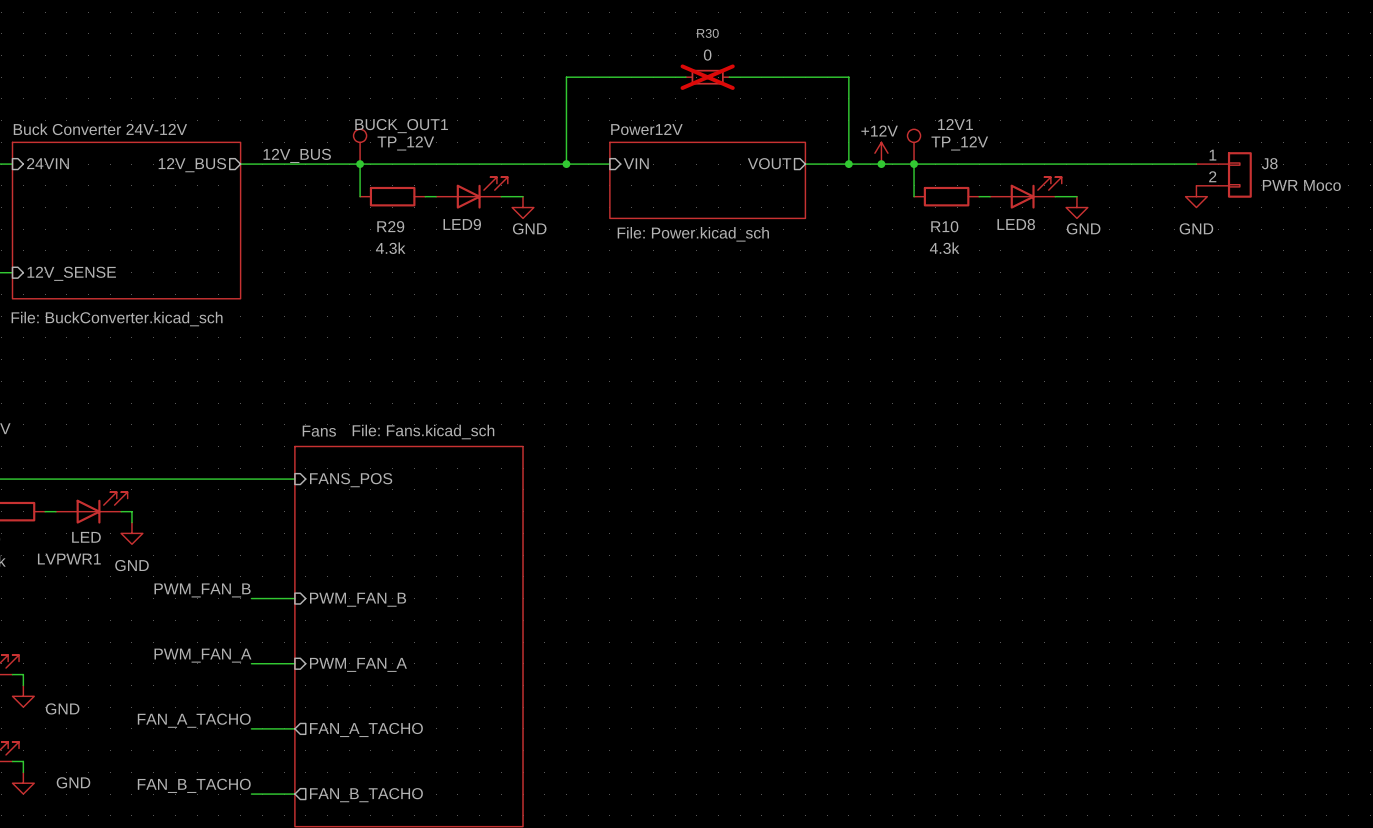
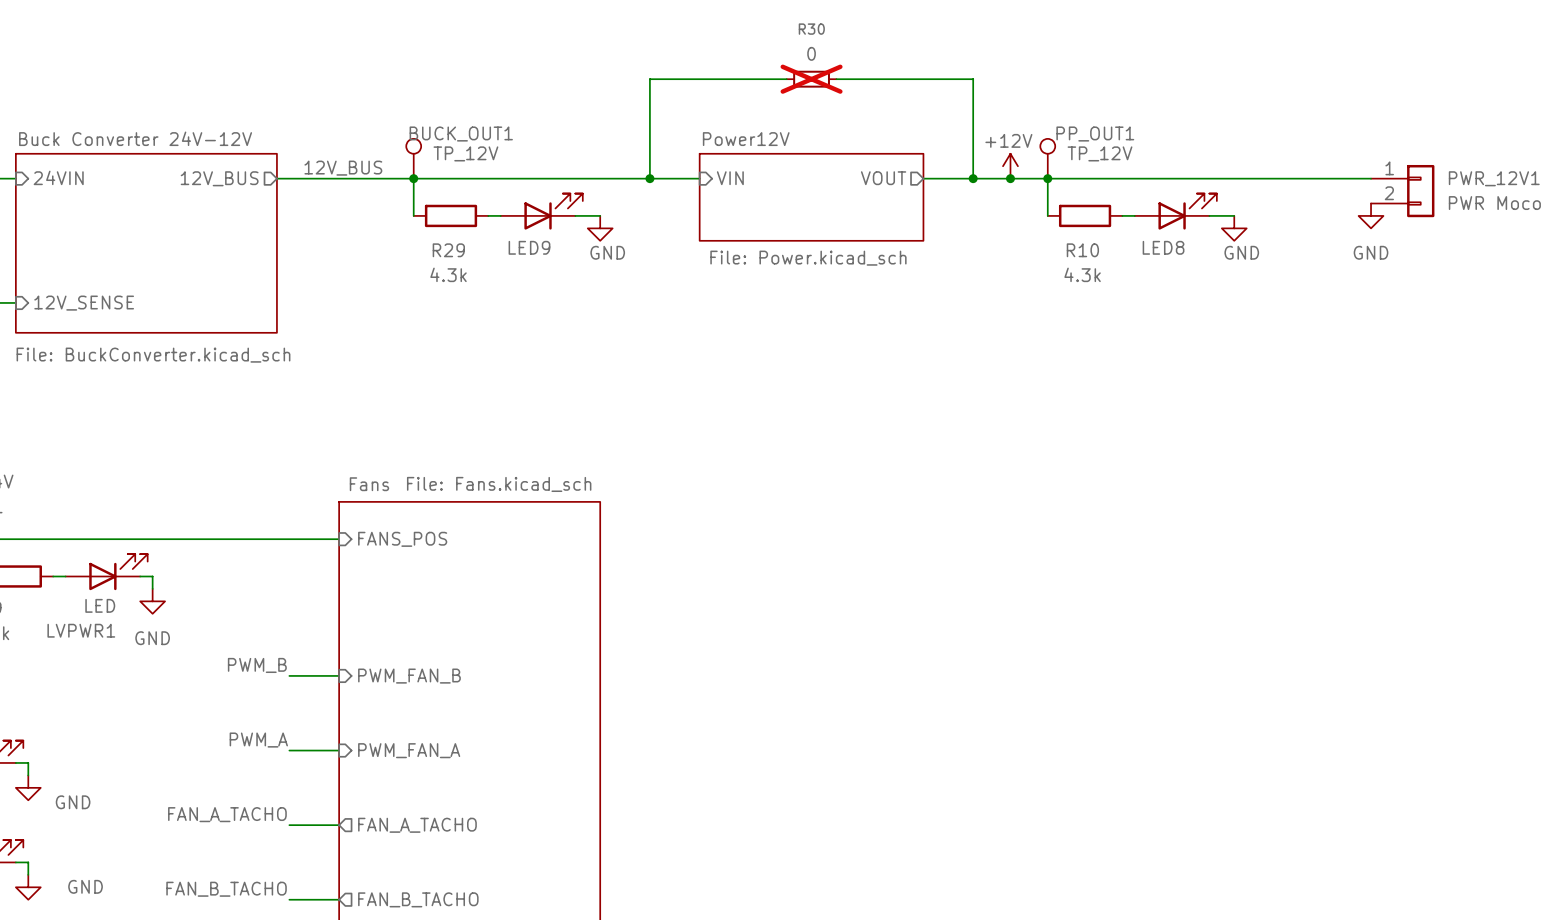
12V1 name: 12V1 (955, 124) -> PP_OUT1 (1095, 134)
J8 name: J8 (1269, 163) -> PWR_12V1 (1494, 178)
label: PWM_FAN_B (202, 590) -> PWM_B (257, 665)
label: PWM_FAN_A (202, 655) -> PWM_A (258, 740)

